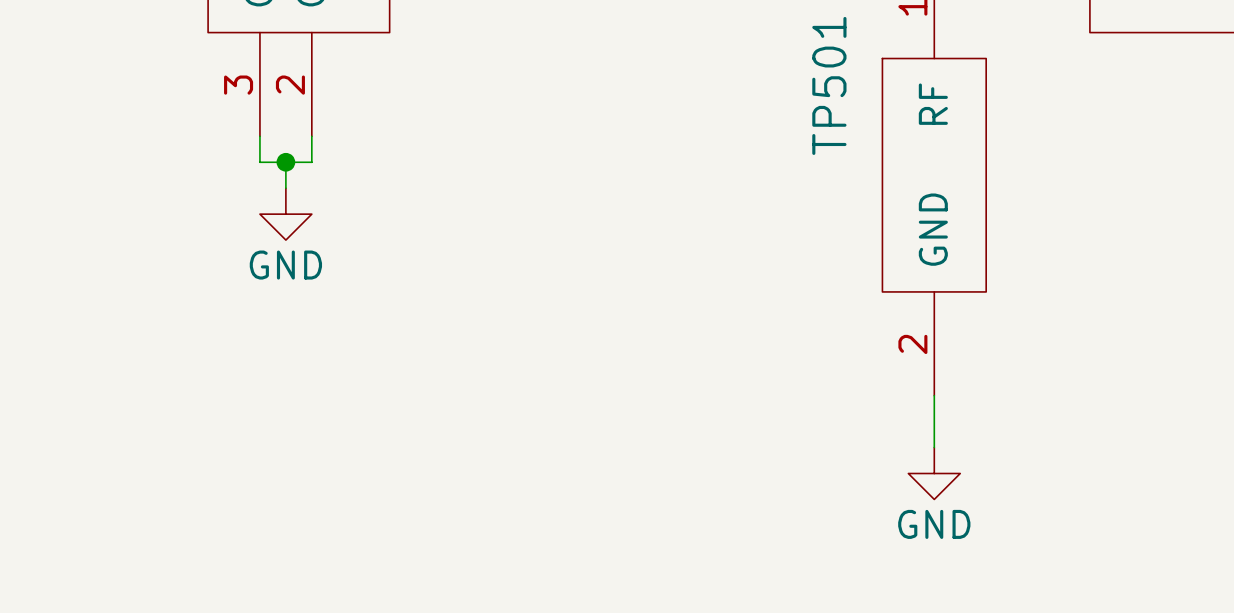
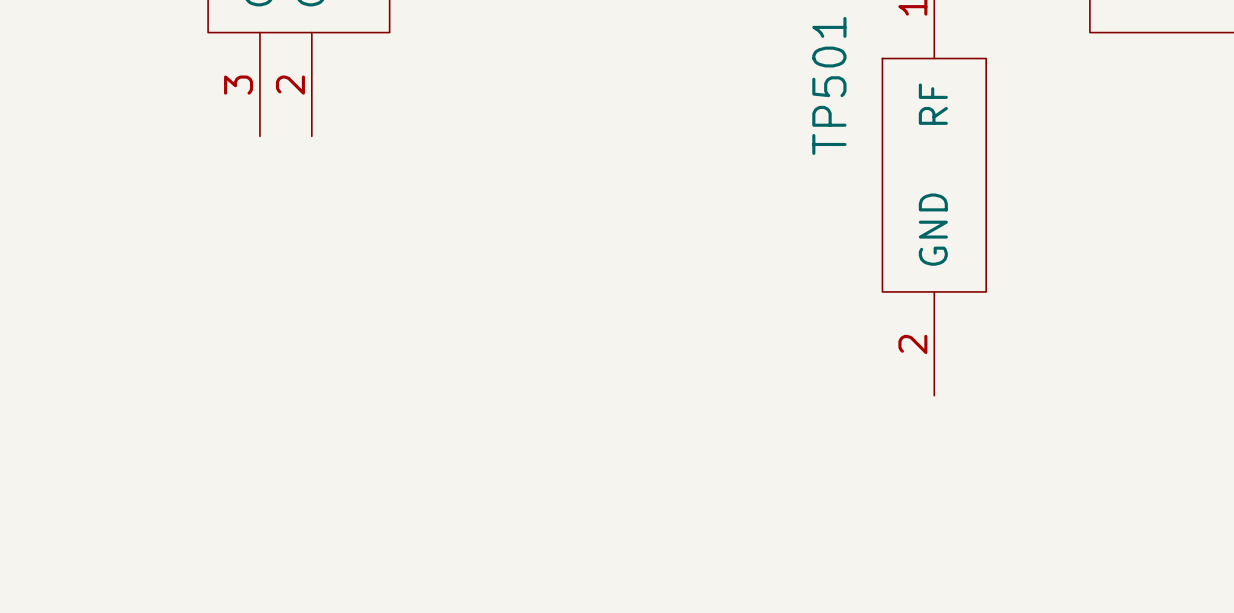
wire: (259, 136) (259, 162) (311, 162) (311, 136) -> none
wire: (285, 162) (285, 188) -> none
junction: (285, 162) -> none
power symbol: GND (285, 214) -> none
wire: (934, 395) (934, 447) -> none
power symbol: GND (934, 473) -> none

